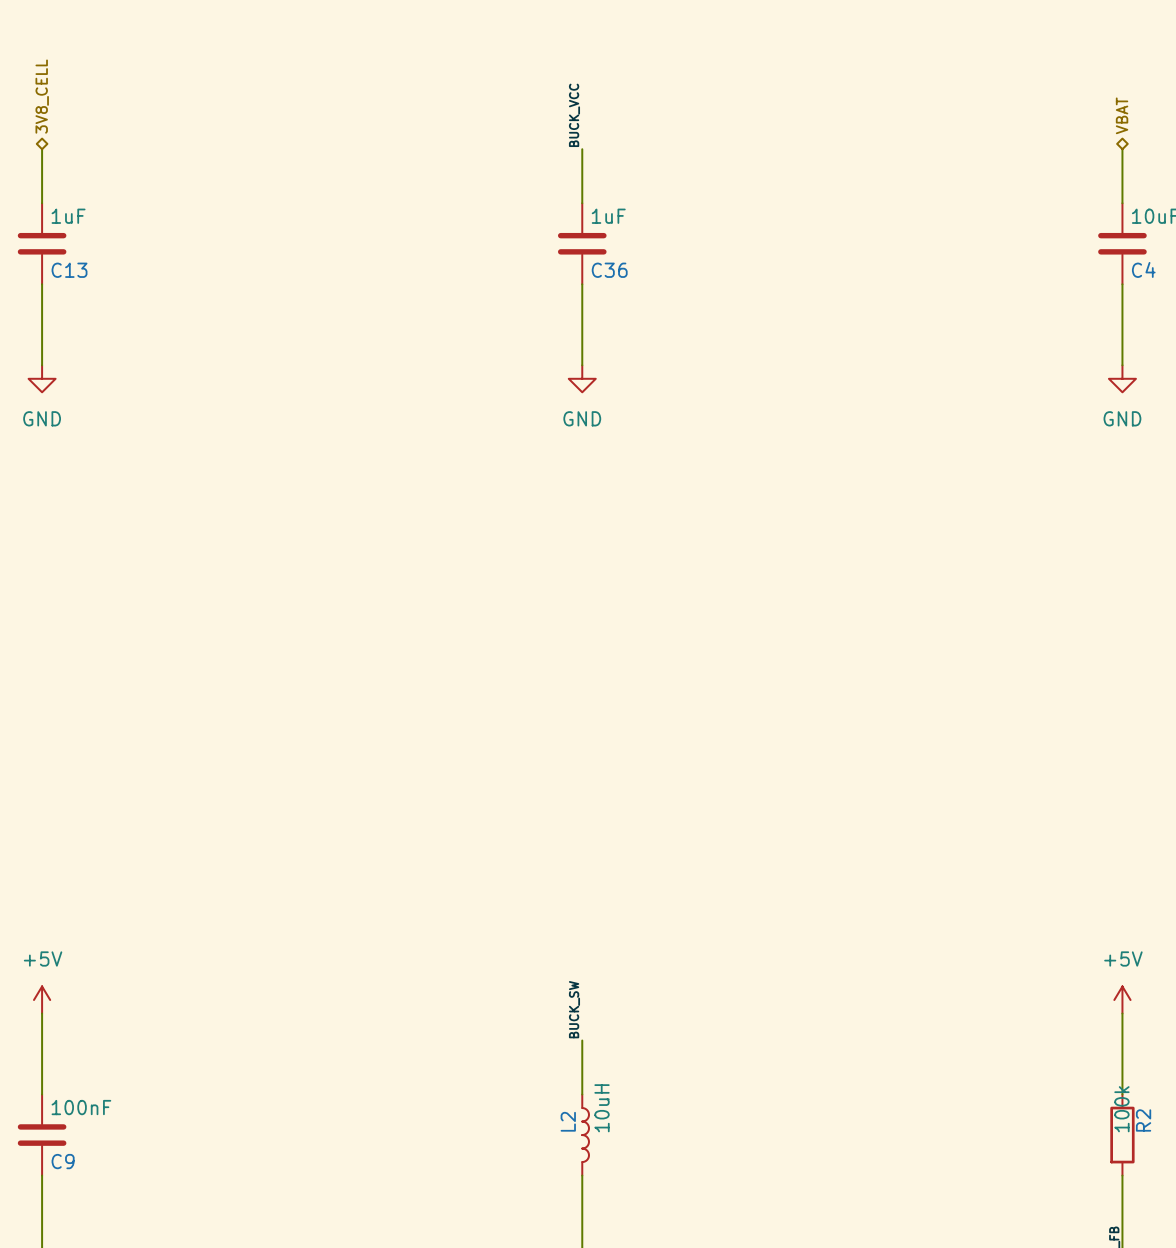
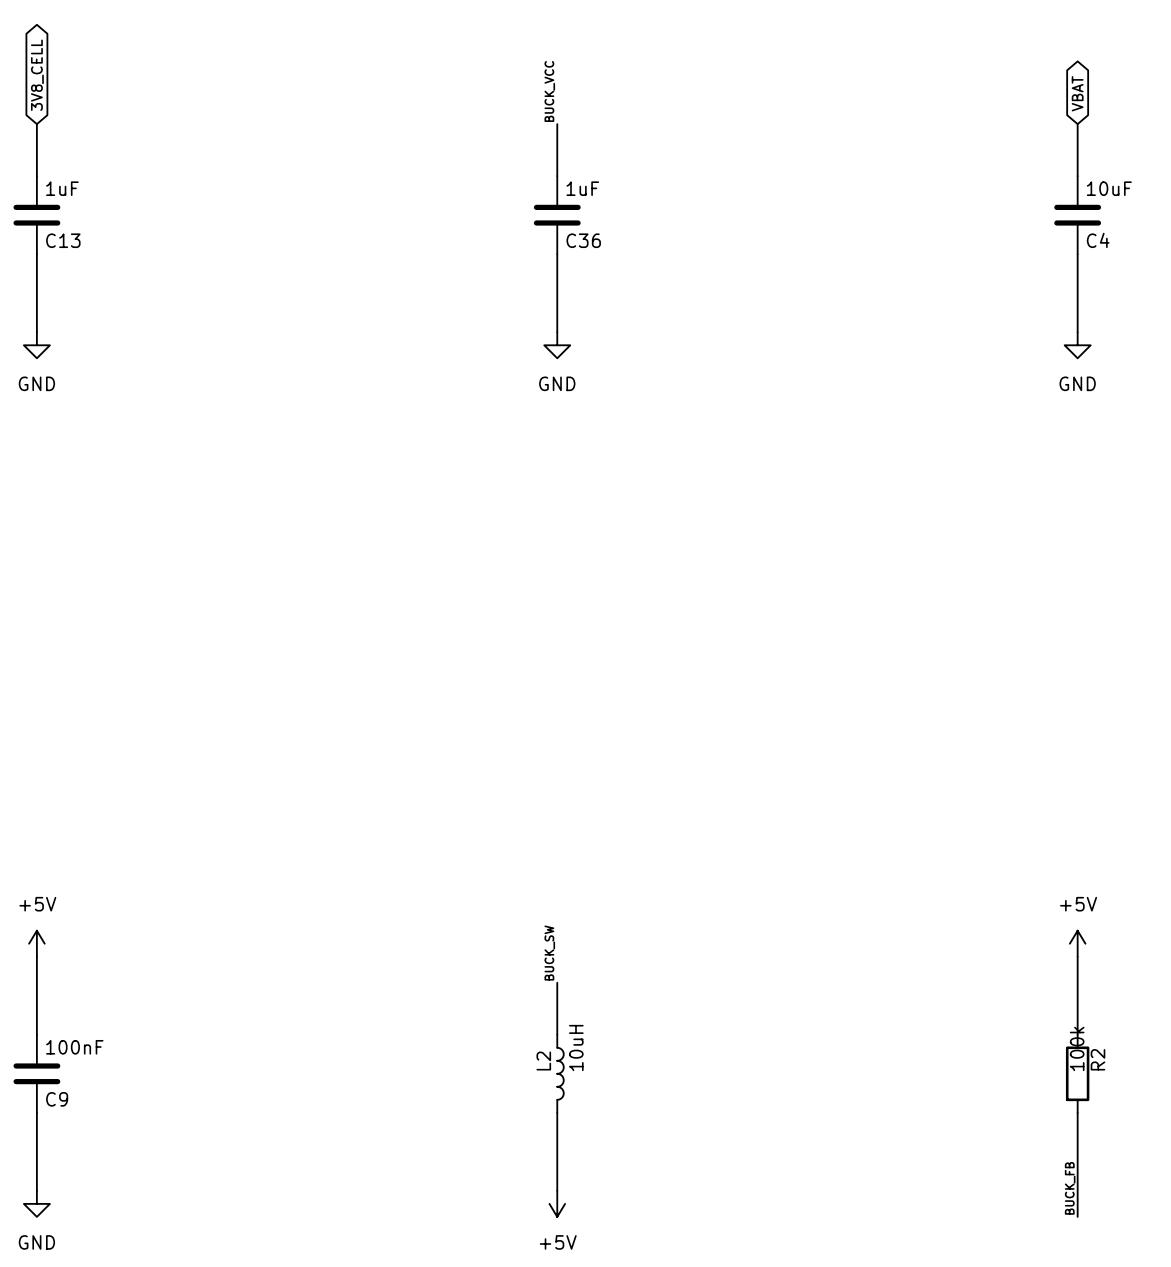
hierarchical label: 3V8_CELL (42, 96) -> none
global label: none -> 3V8_CELL (37, 75)
hierarchical label: VBAT (1122, 115) -> none
global label: none -> VBAT (1077, 93)

